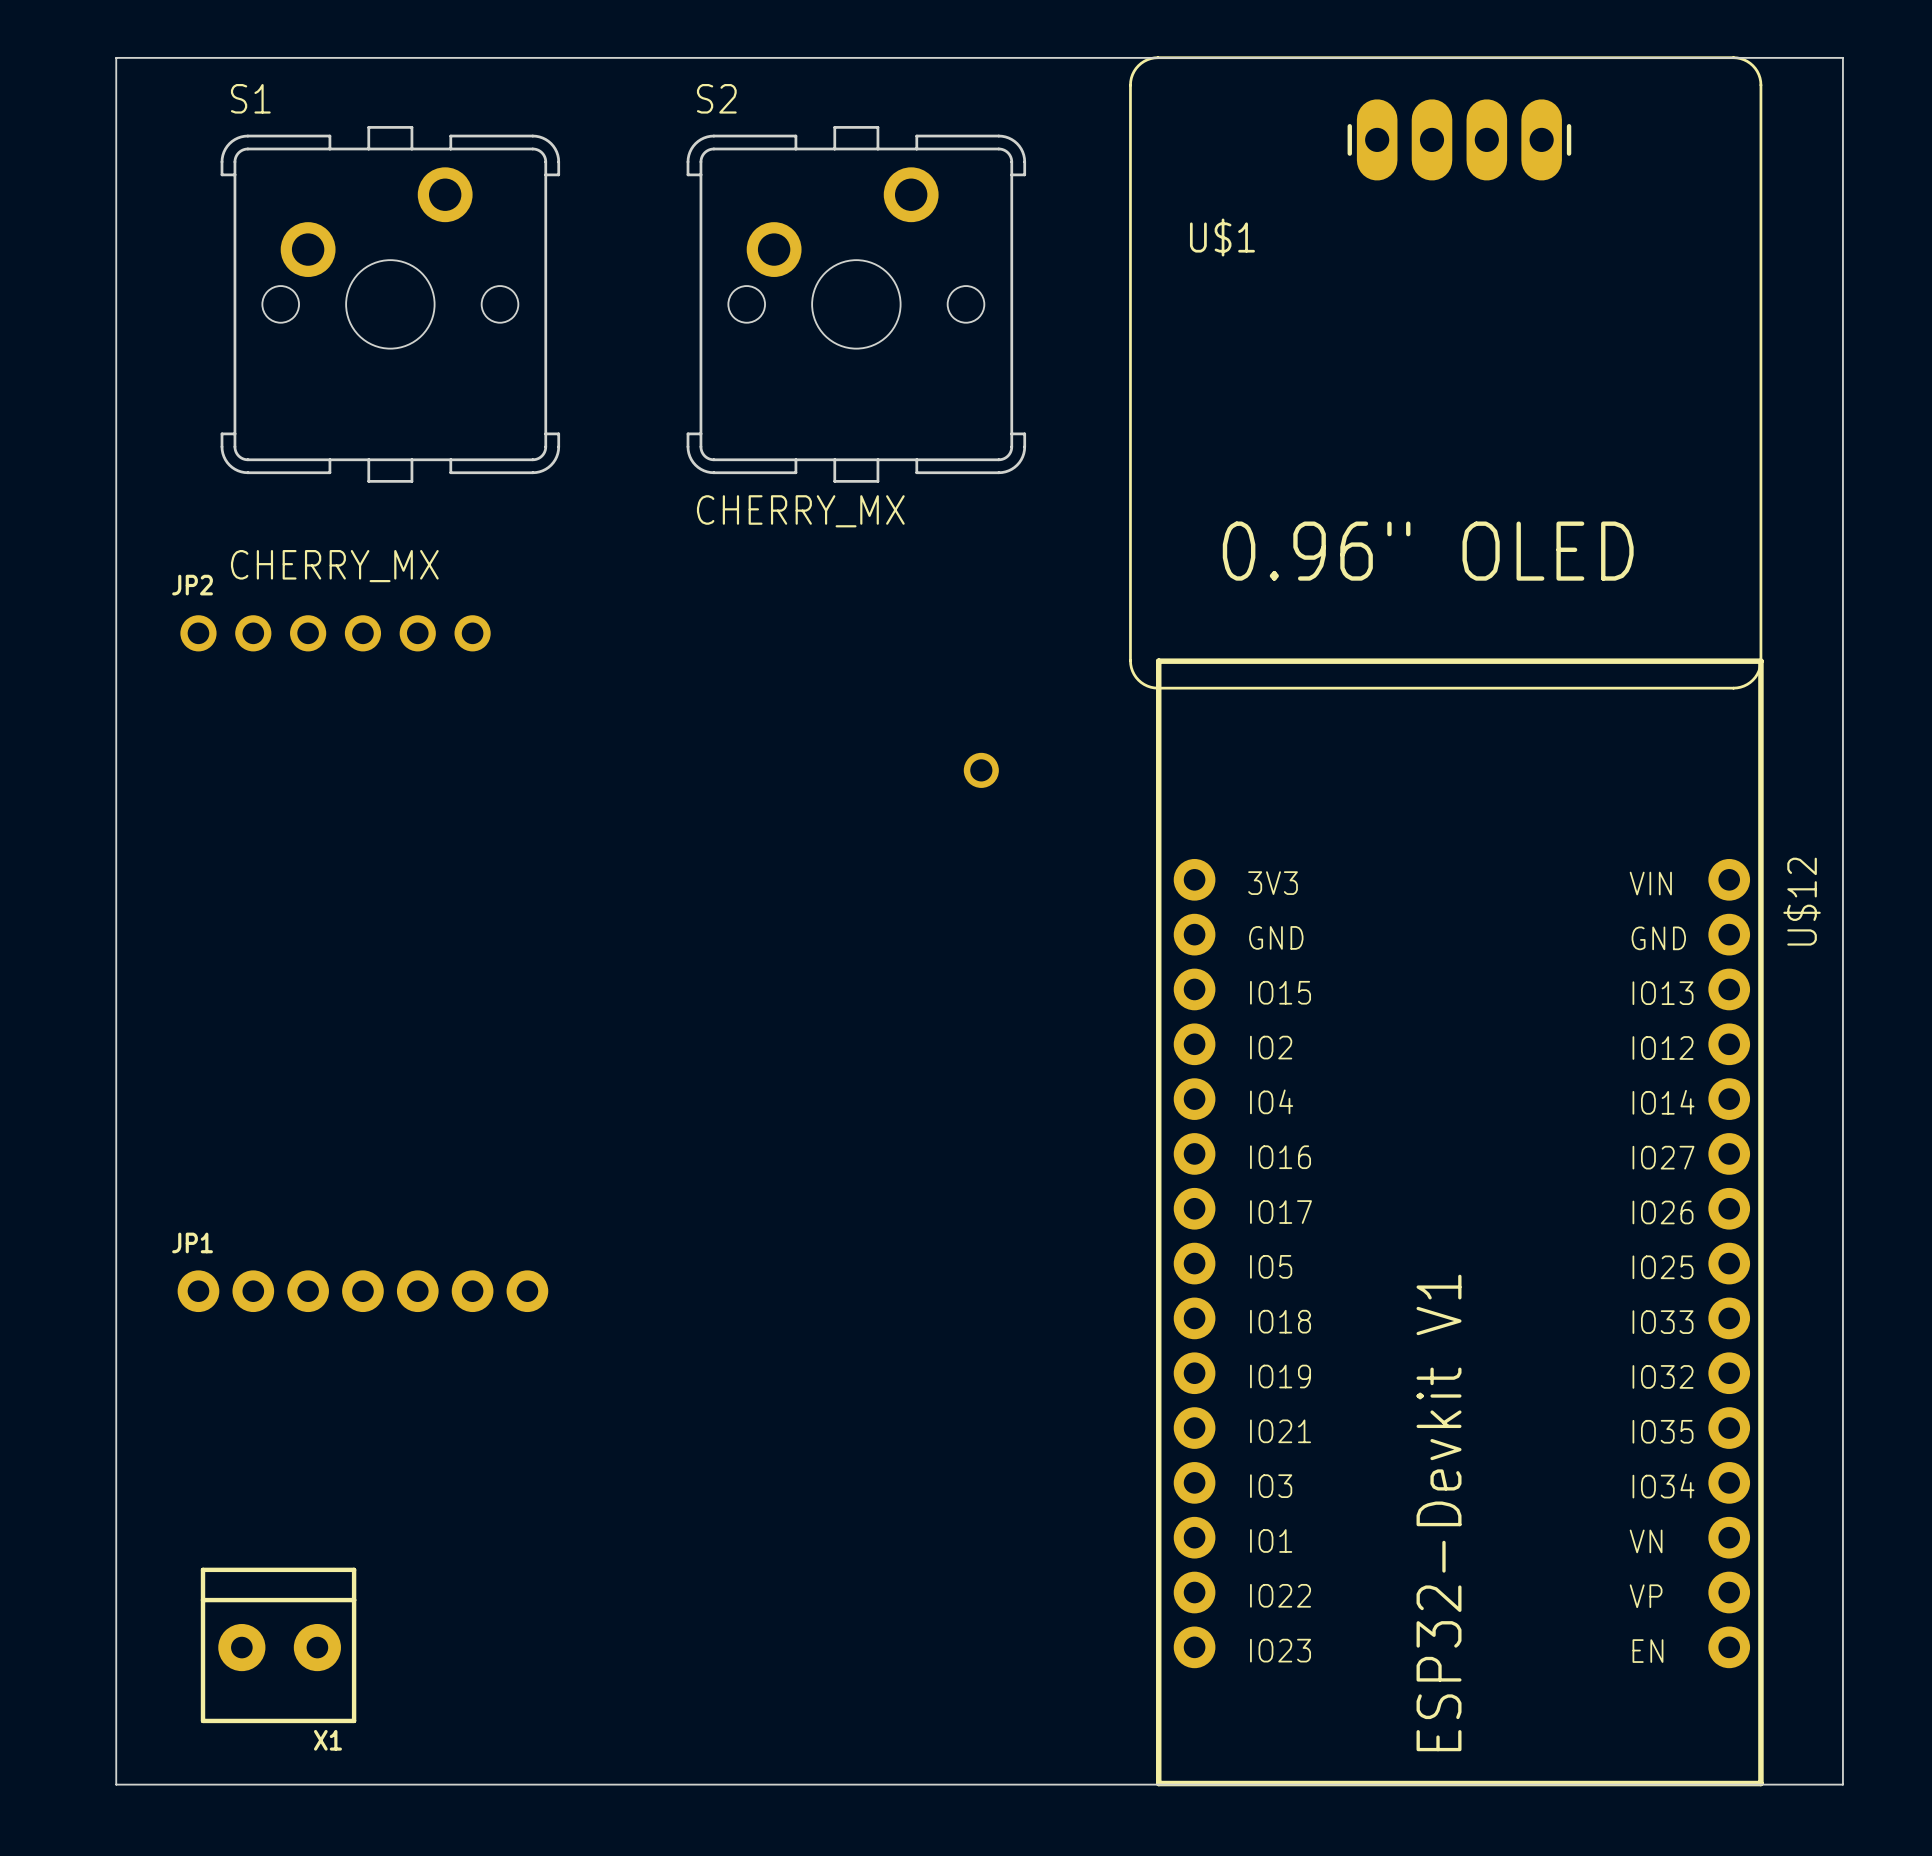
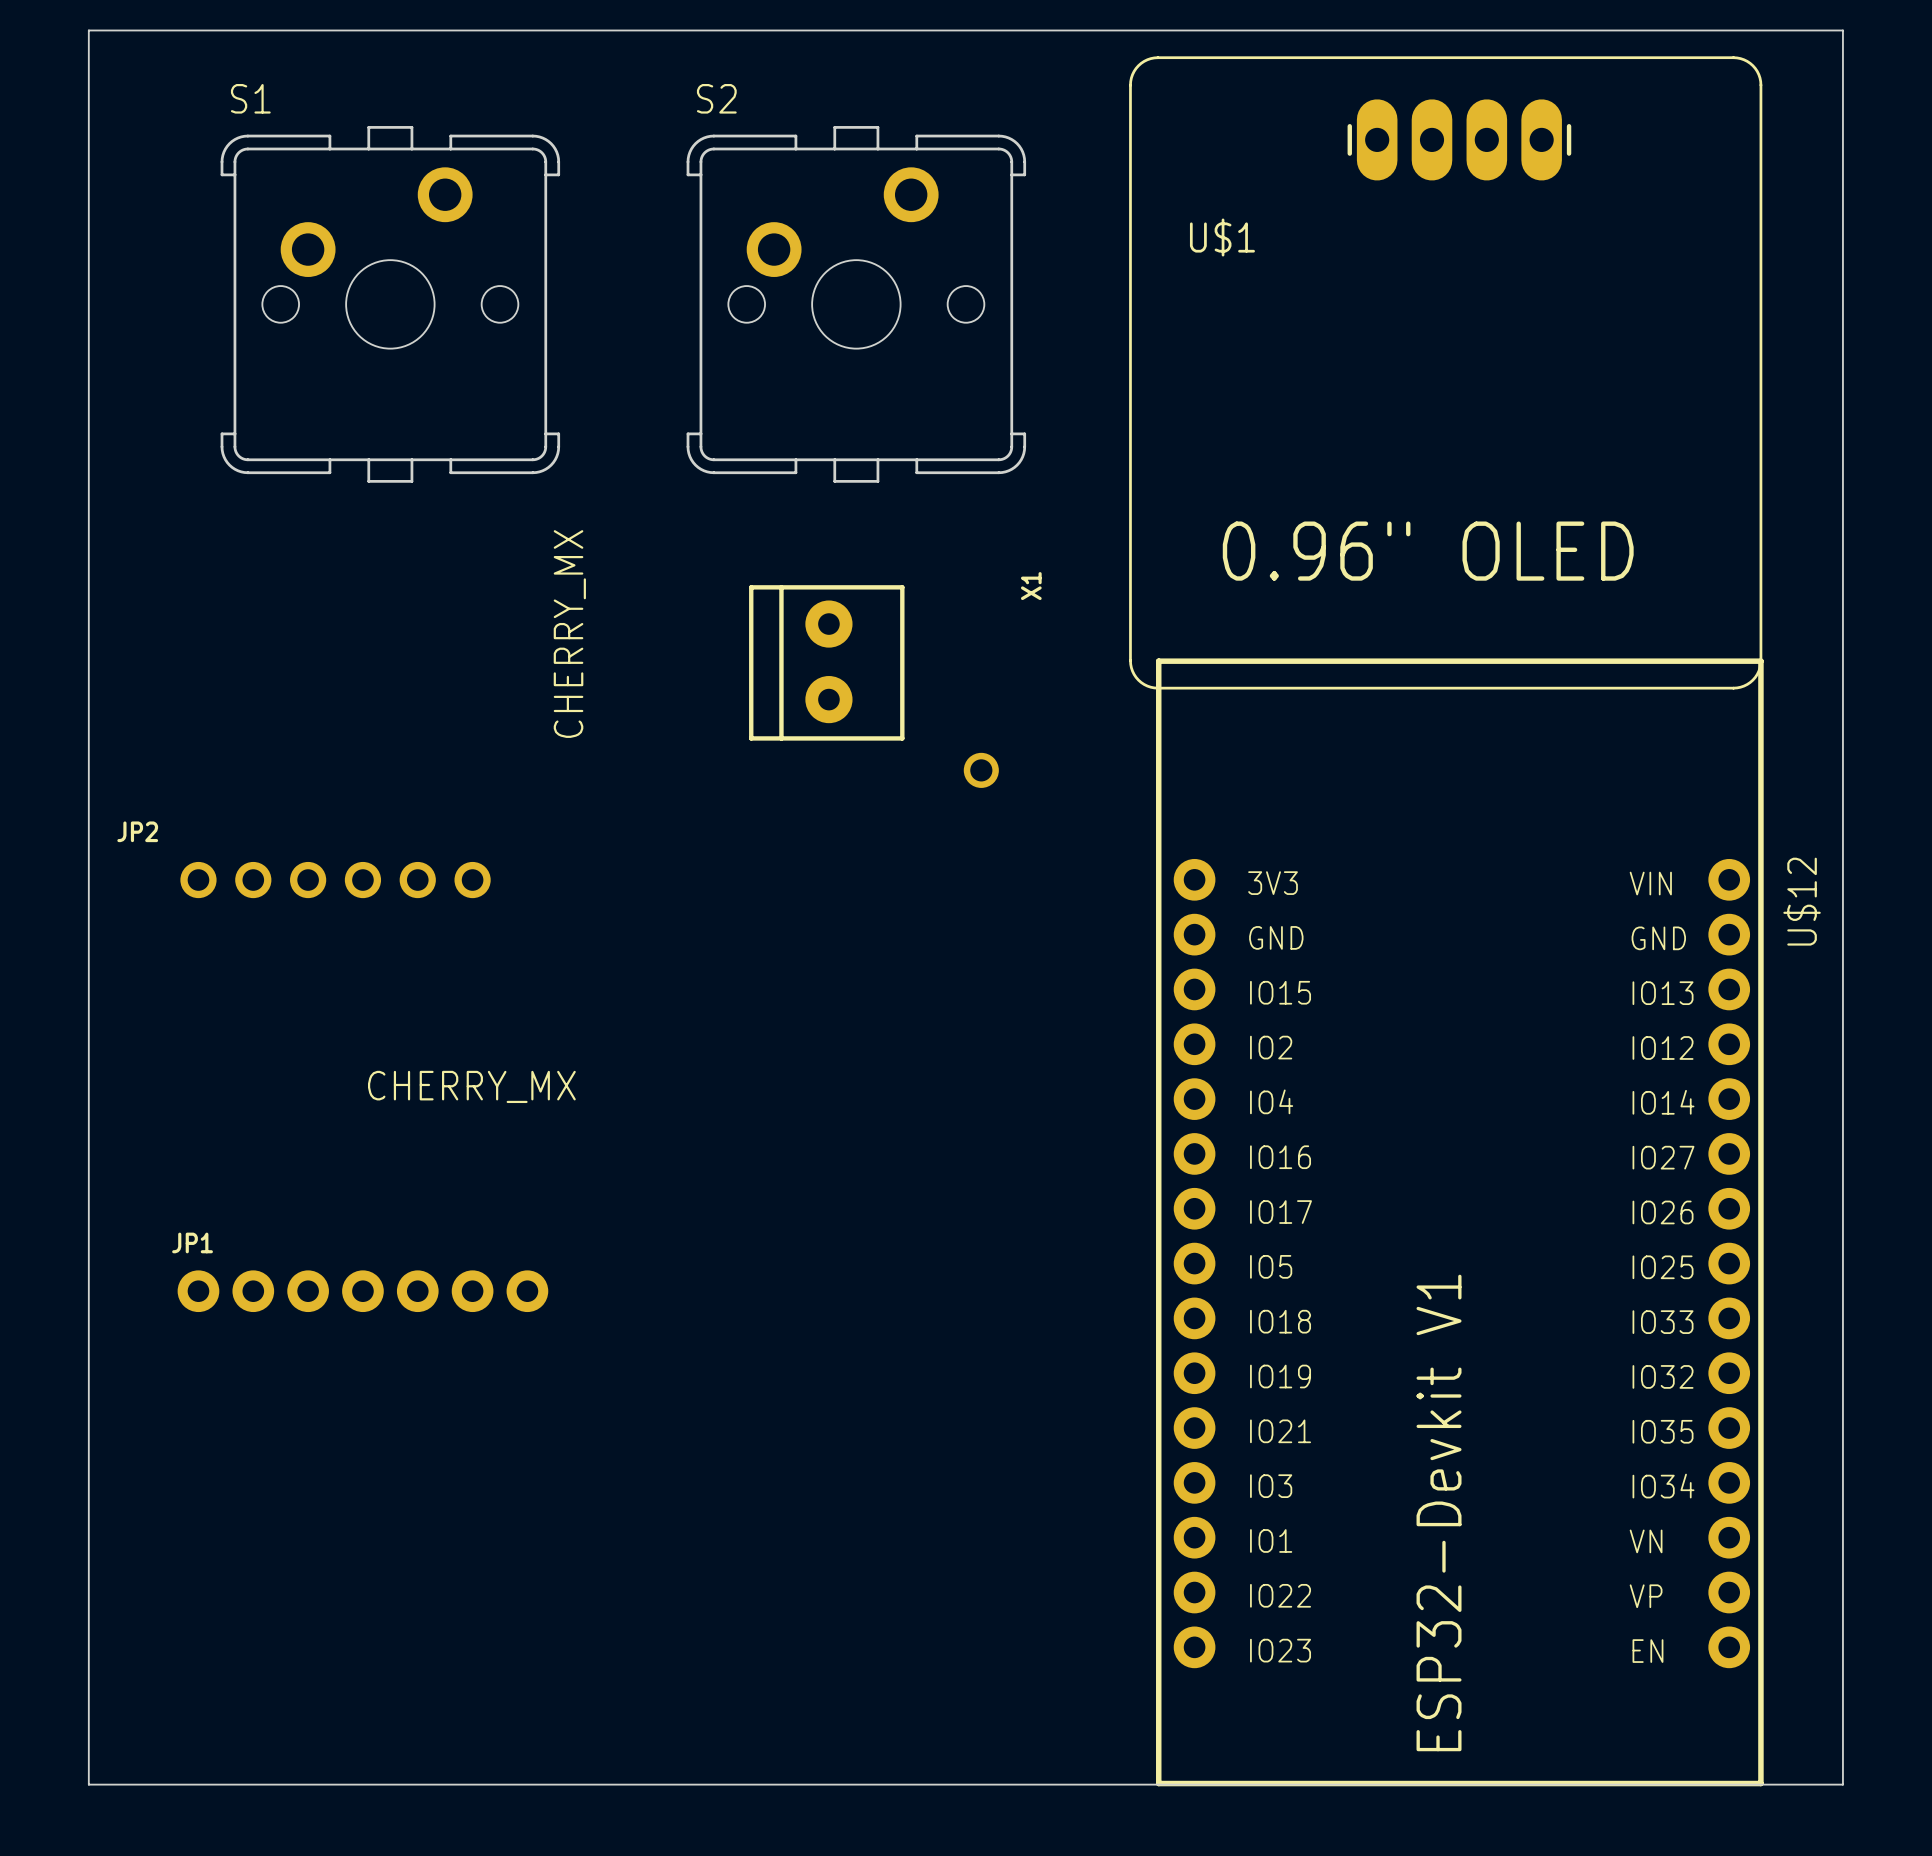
board edge: (1842, 57) (116, 57) (116, 1784) -> (1842, 57) (1842, 30) (88, 30) (88, 1784) (116, 1784)
S2 value rotation: 0° (800, 511) -> 90° counterclockwise (569, 634)
S2 value position: CHERRY_MX (800, 511) -> CHERRY_MX (569, 634)
S1 value position: CHERRY_MX (334, 566) -> CHERRY_MX (471, 1086)
JP2 name position: JP2 (192, 585) -> JP2 (137, 831)
JP2 position: (335, 633) -> (335, 880)
X1 rotation: 0° (278, 1645) -> 90° counterclockwise (826, 662)
X1 position: (278, 1645) -> (826, 662)
X1 name position: X1 (327, 1740) -> X1 (1031, 586)

